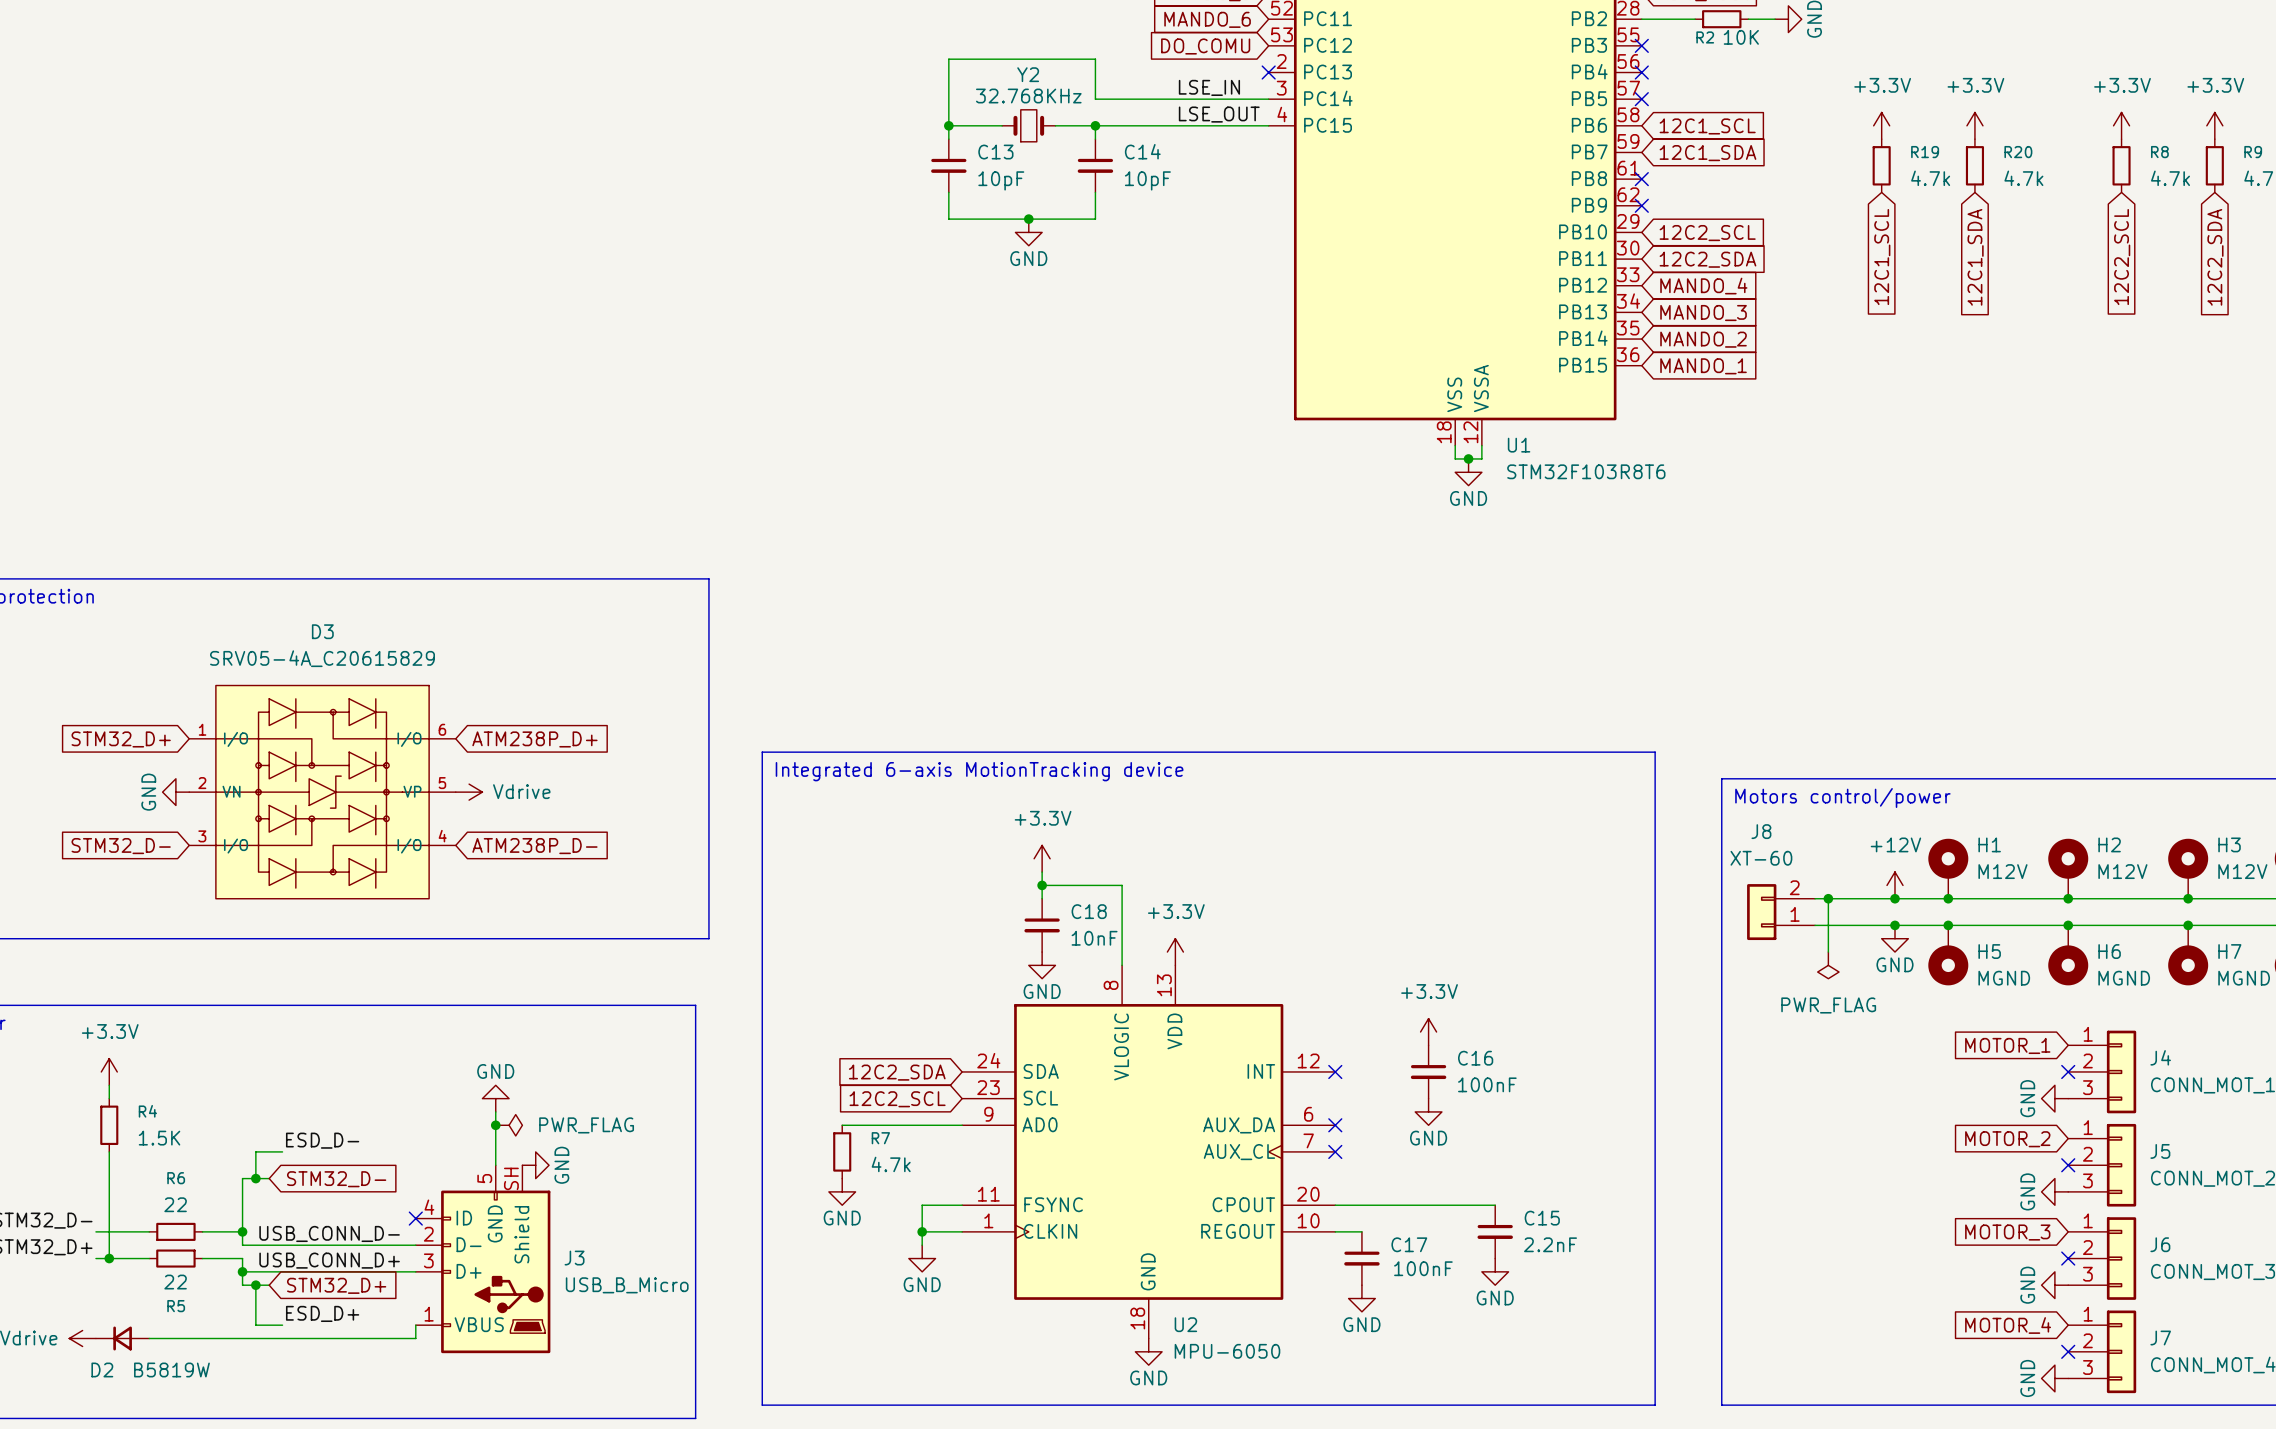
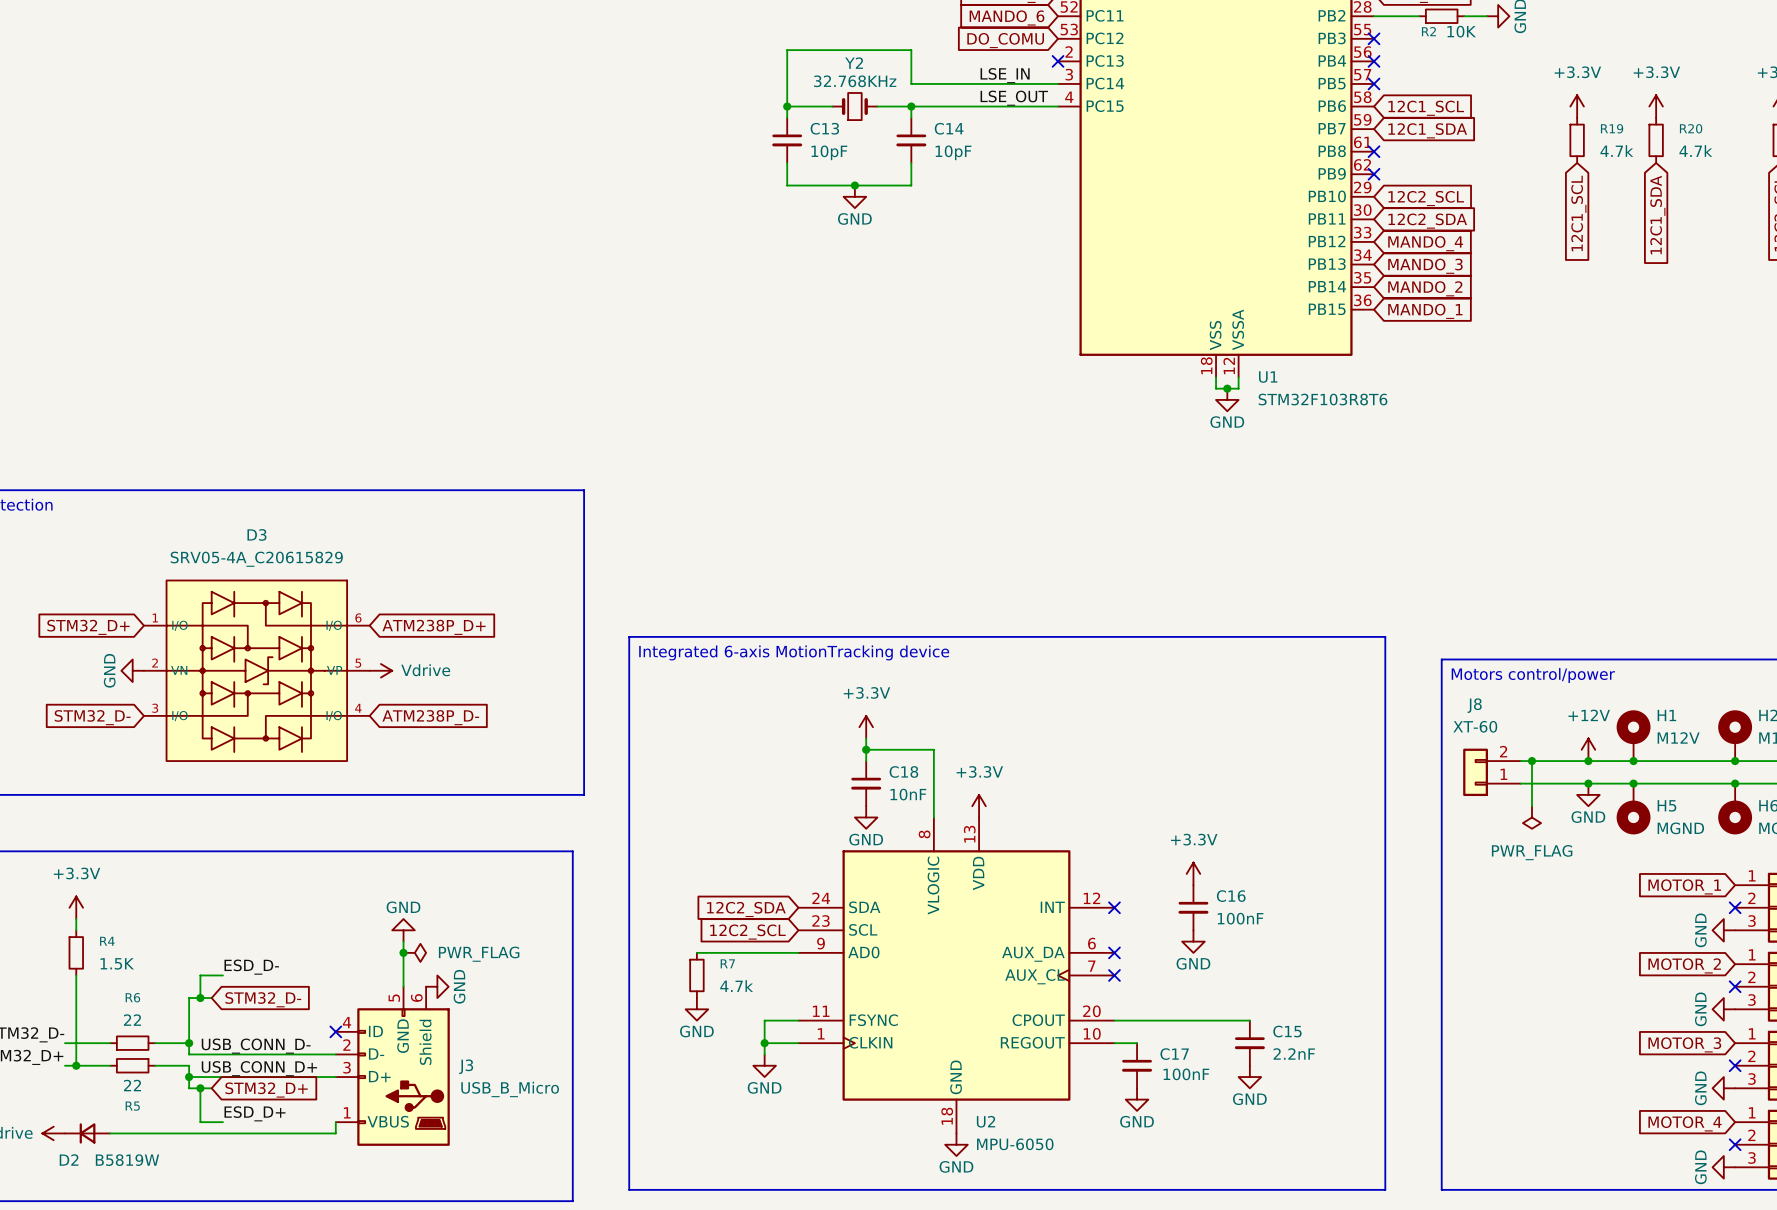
J3 pin number: SH (511, 1178) -> 6 (416, 997)

